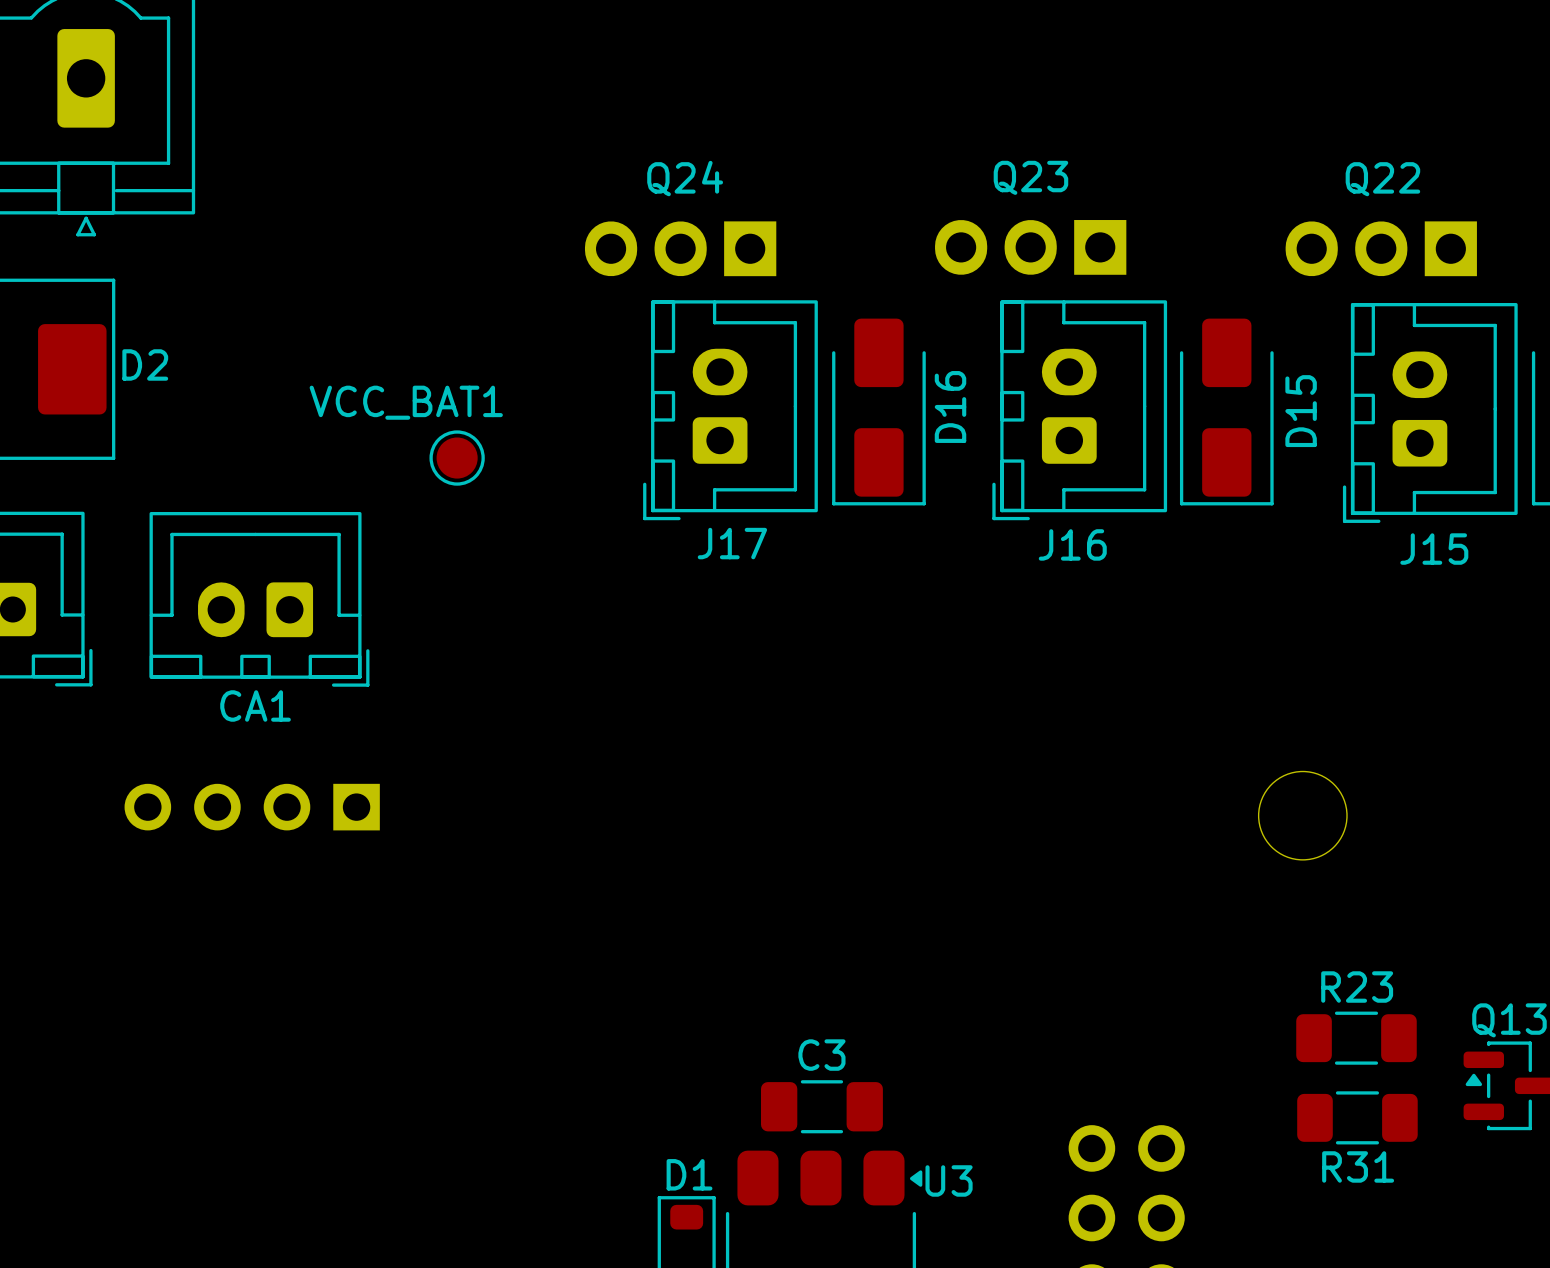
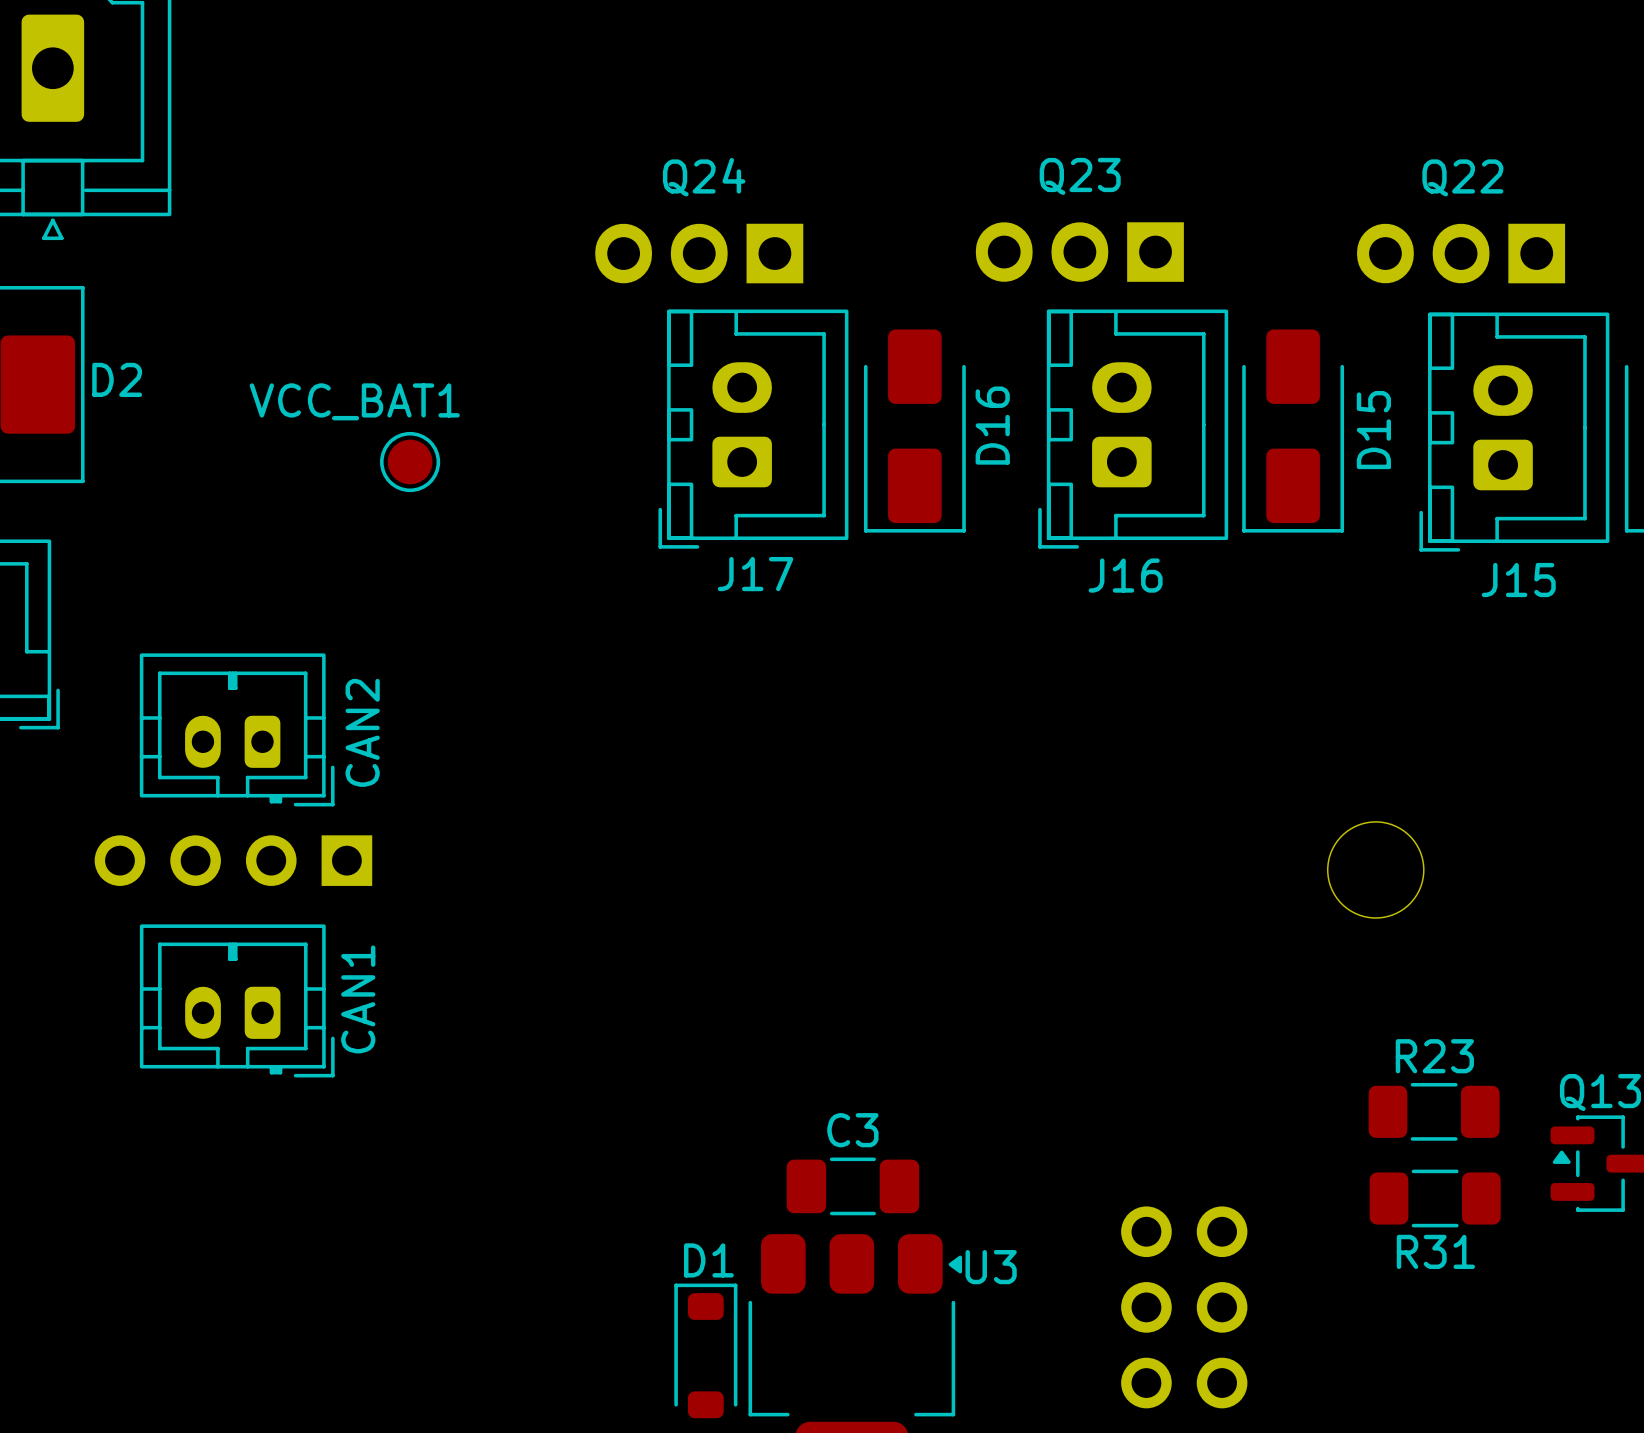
VCC_BAT1 position: (457, 458) -> (410, 462)
CA1: (259, 599) -> none
CAN2: none -> (237, 729)
CAN1: none -> (237, 1000)

